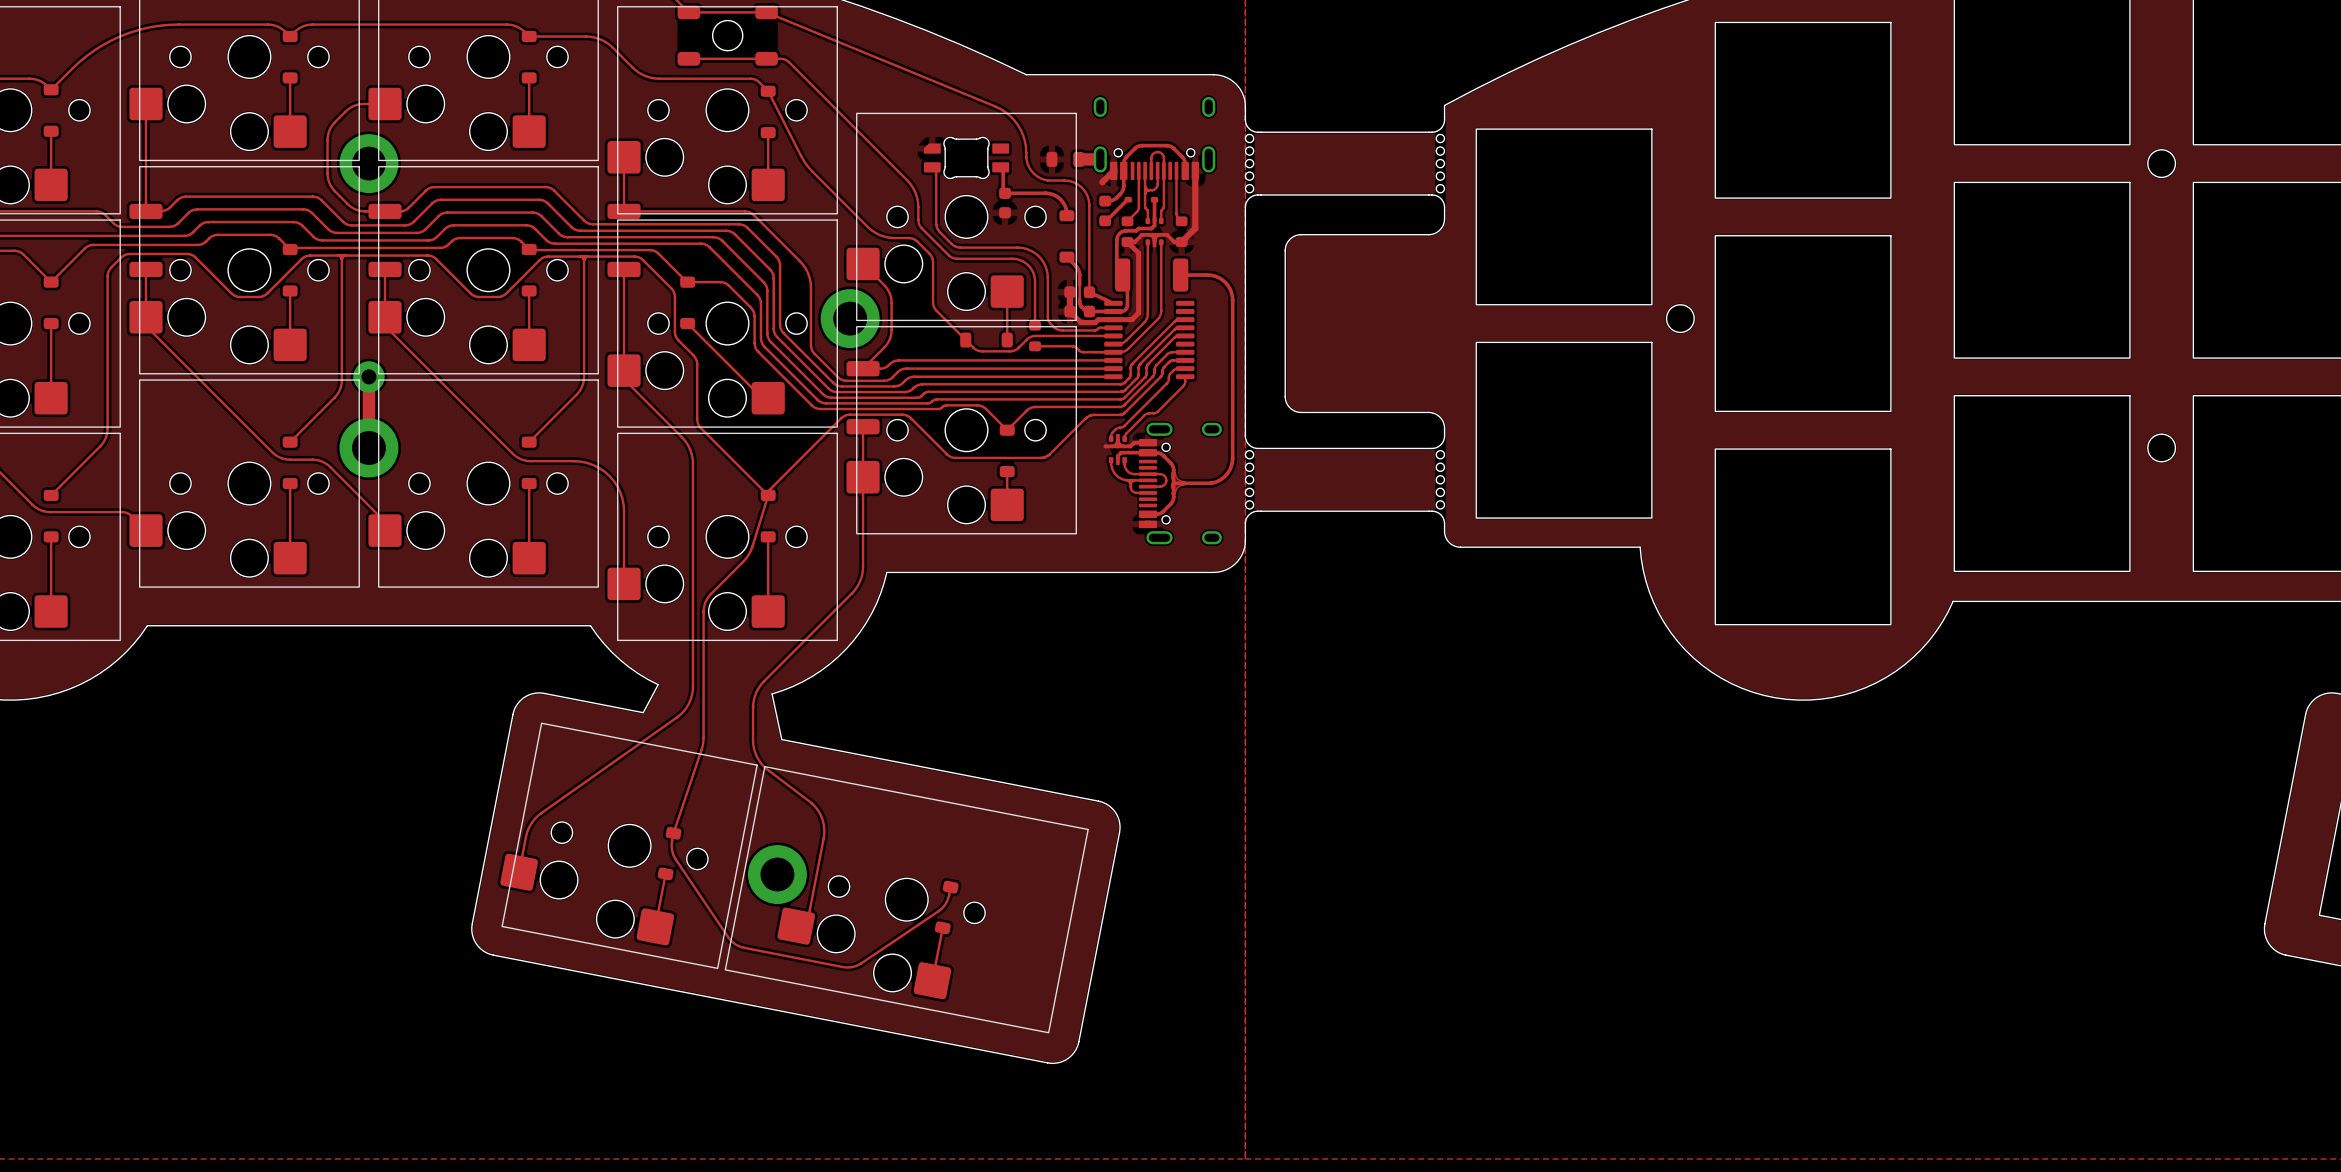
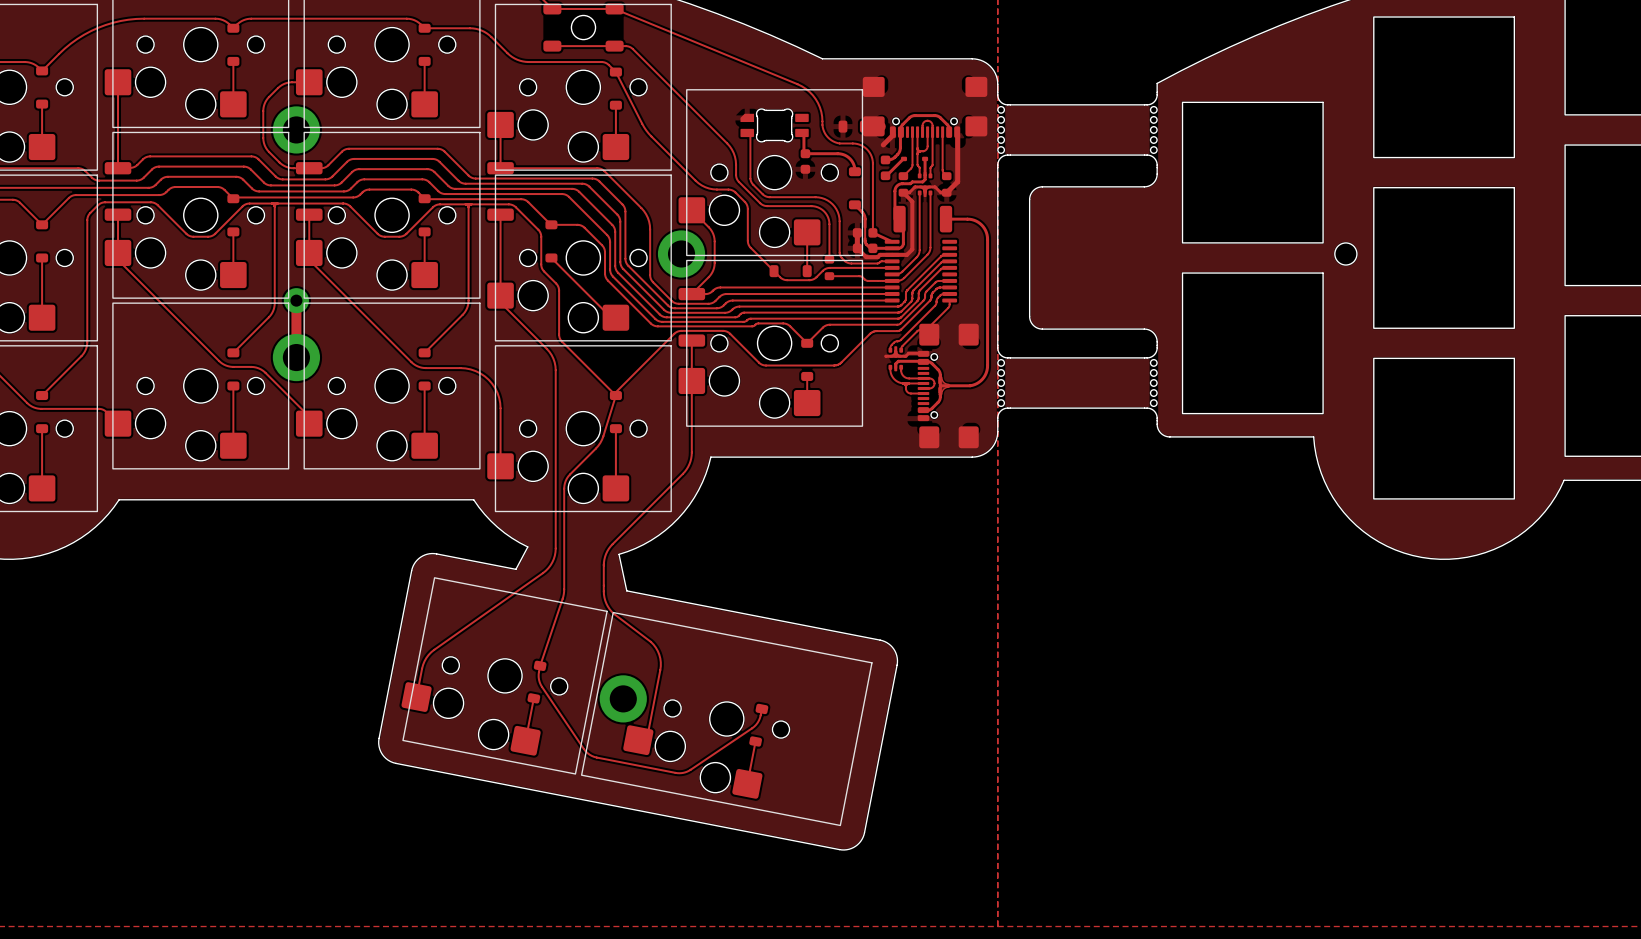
part footprint: [1093, 96, 1216, 180] -> [862, 76, 988, 138]
part footprint: [1138, 422, 1222, 545] -> [917, 323, 979, 449]

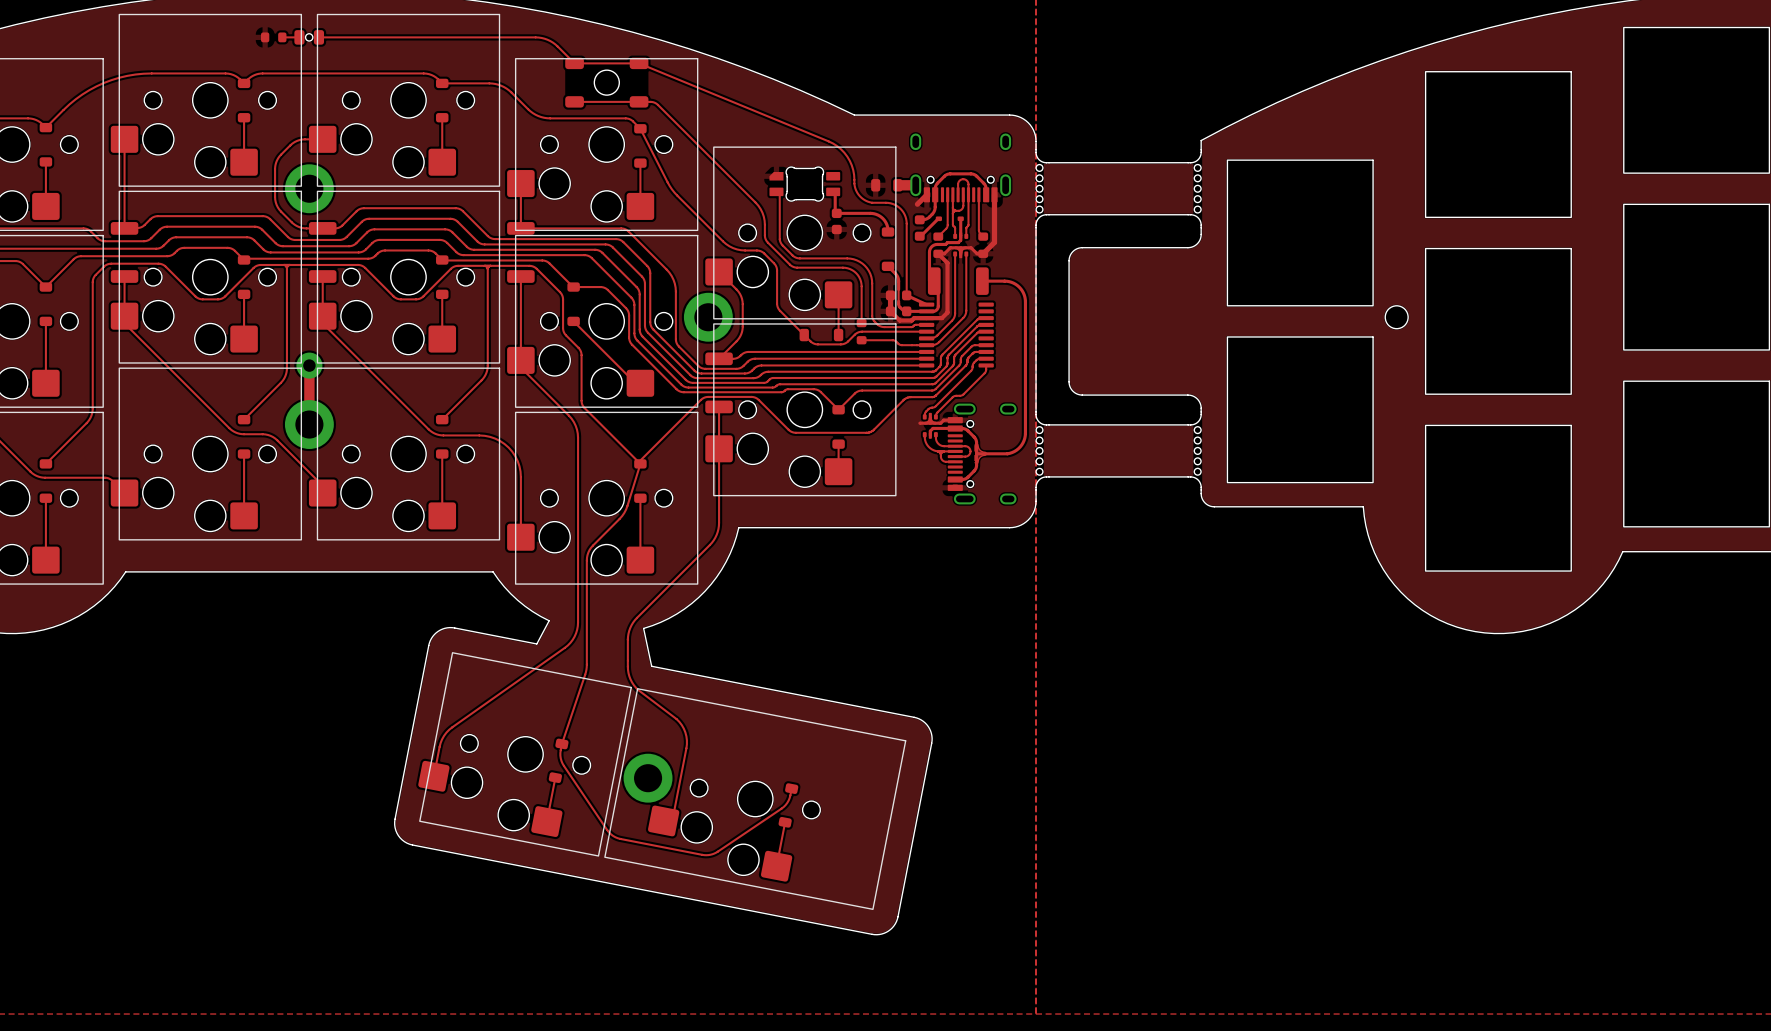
part footprint: [862, 76, 988, 138] -> [910, 133, 1012, 203]
part footprint: [917, 323, 979, 449] -> [947, 403, 1017, 505]

